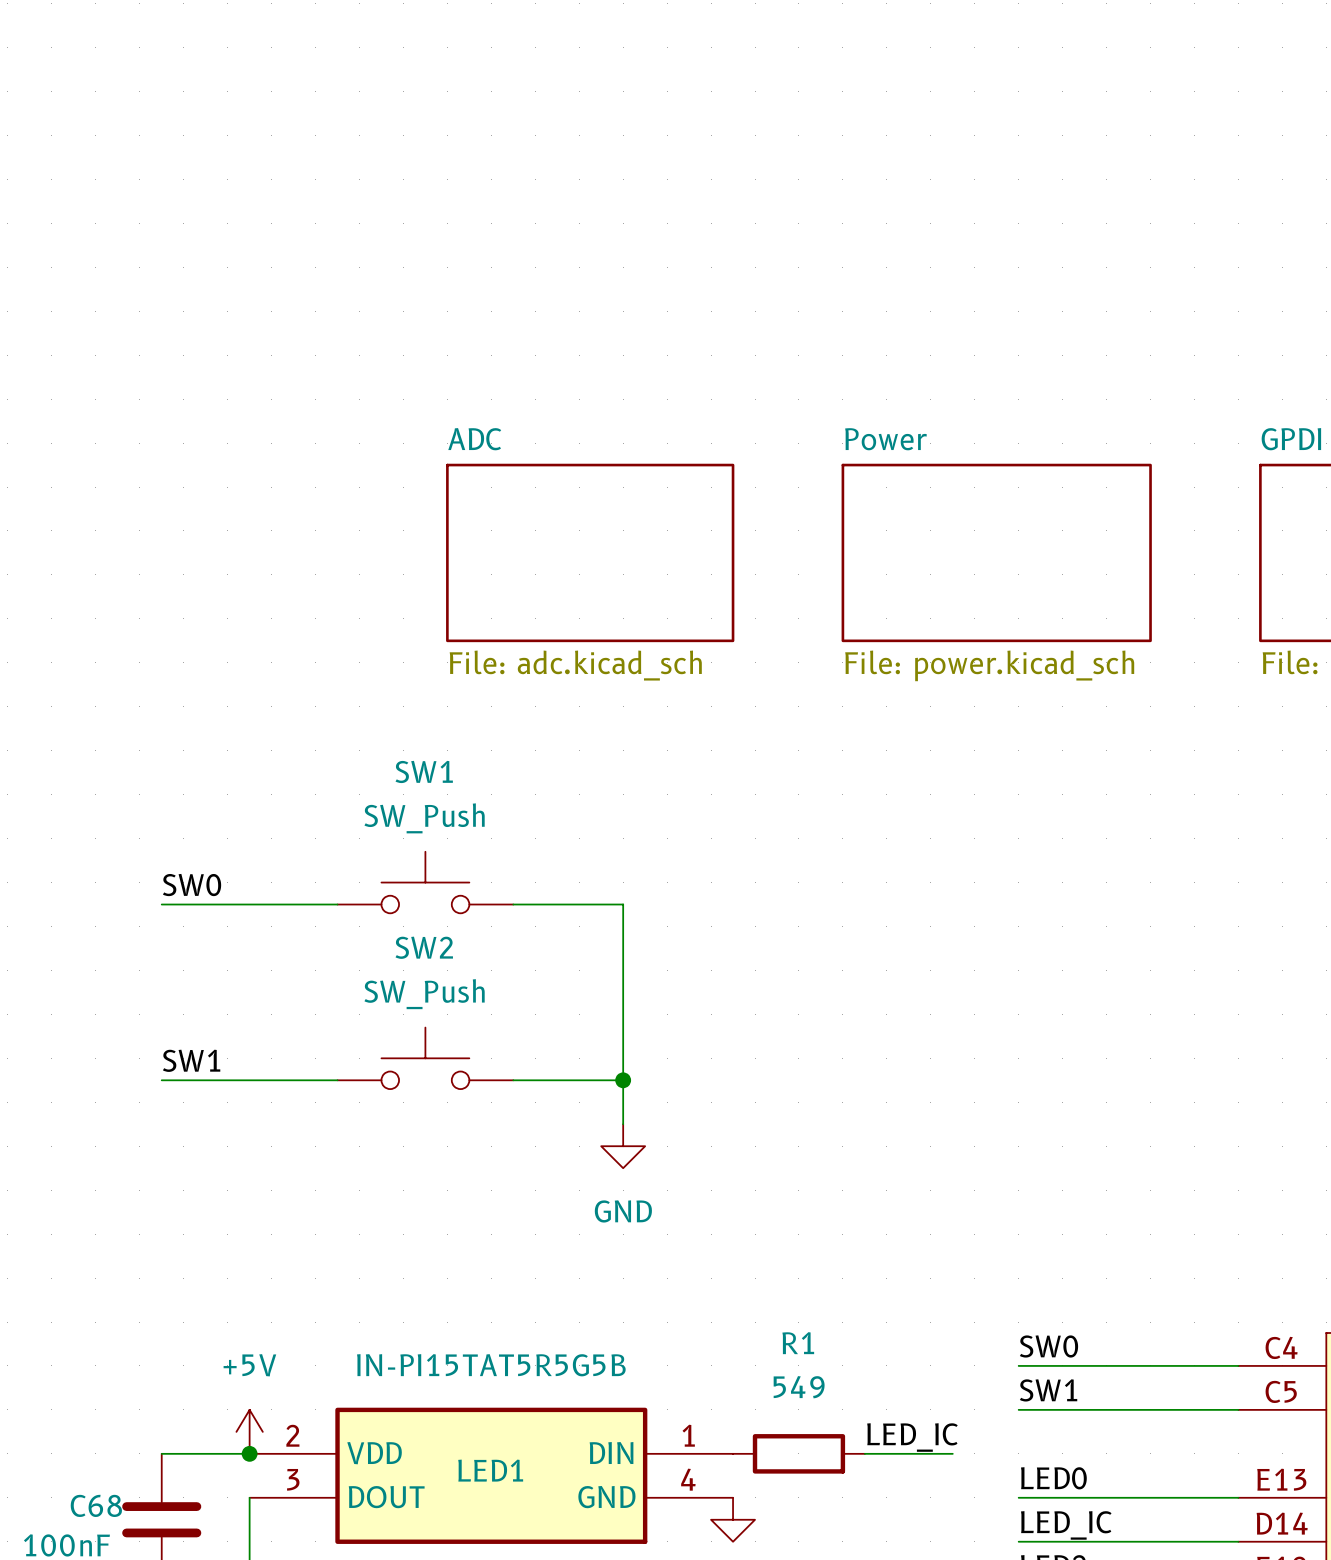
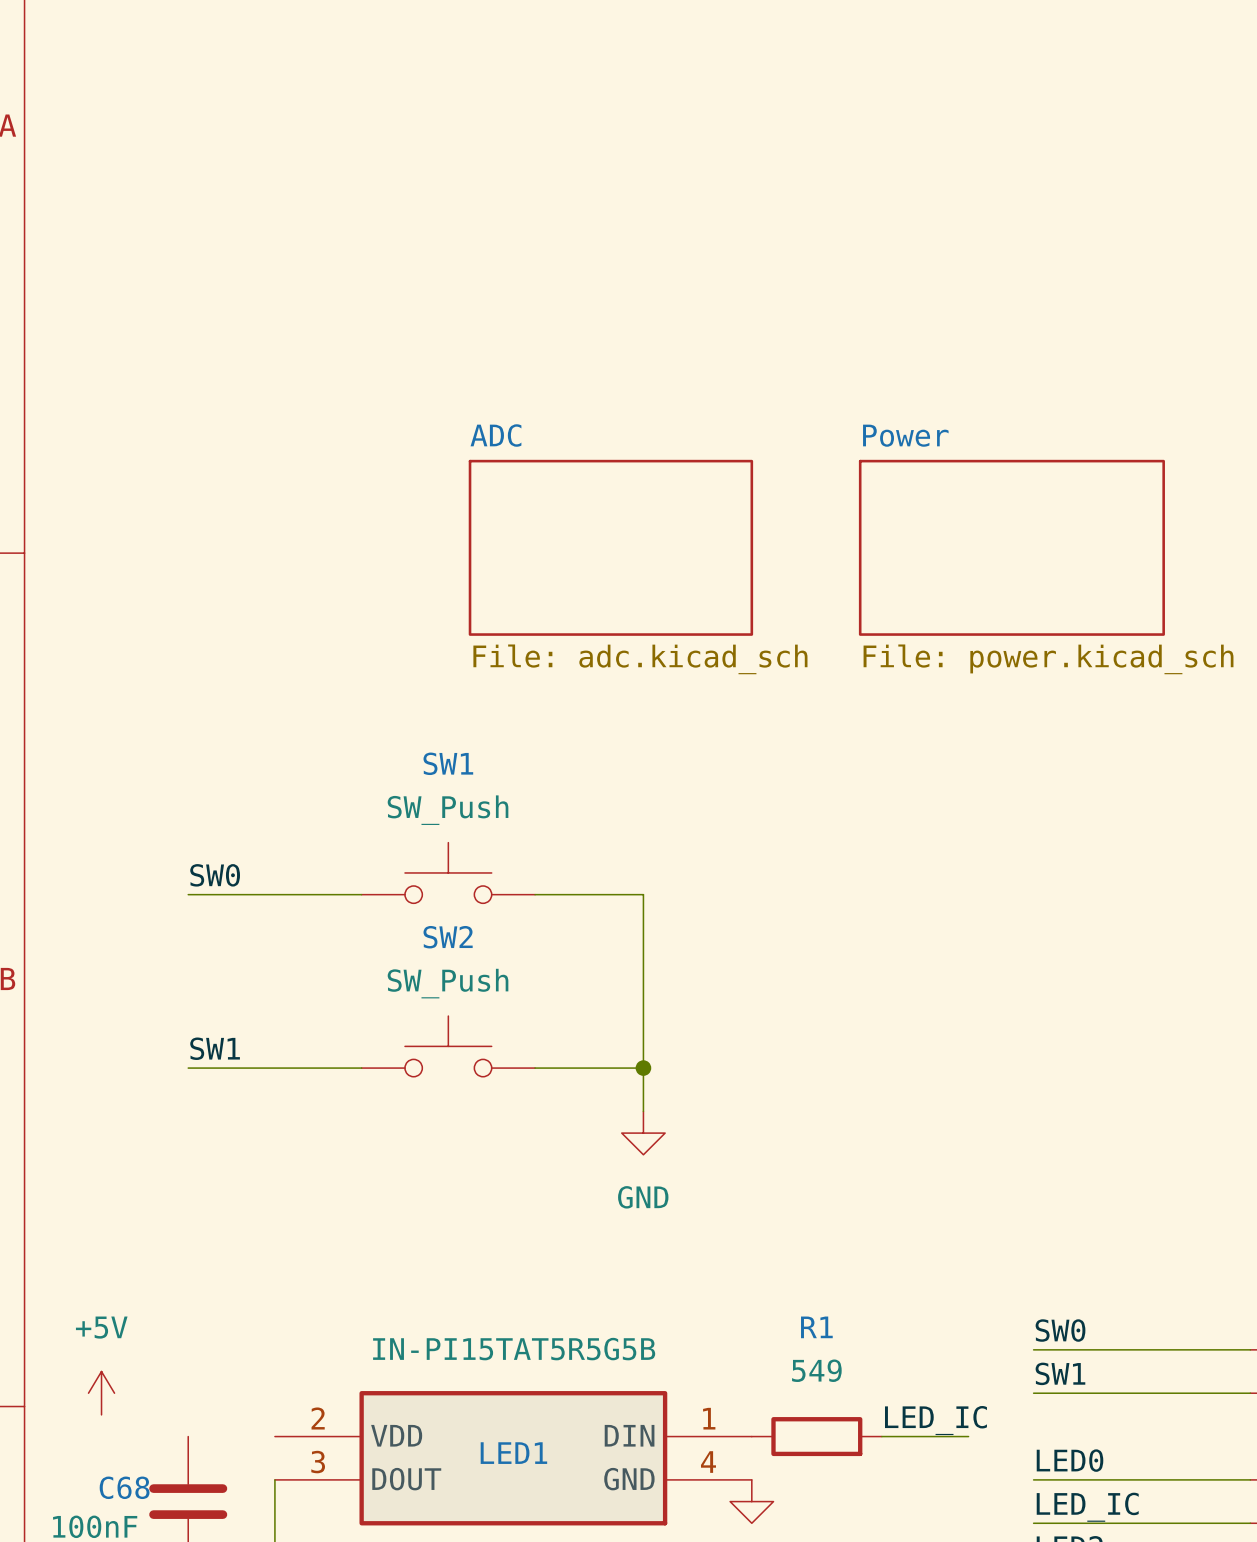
power symbol: none -> +5V (101, 1393)
power symbol: +5V (249, 1431) -> none
wire: (161, 1453) (249, 1453) -> none
junction: (249, 1453) -> none

